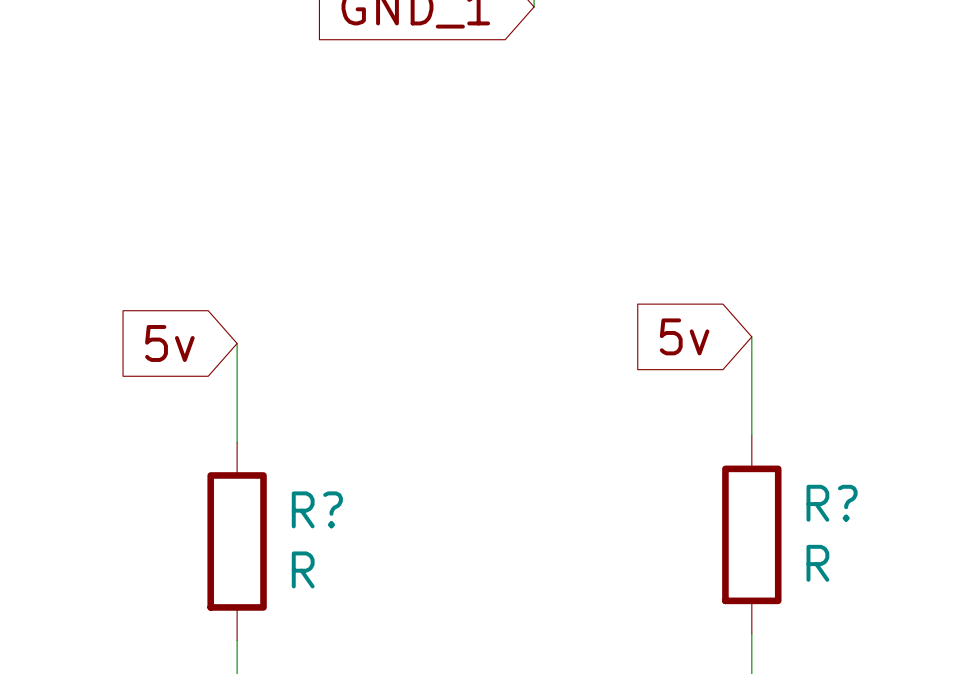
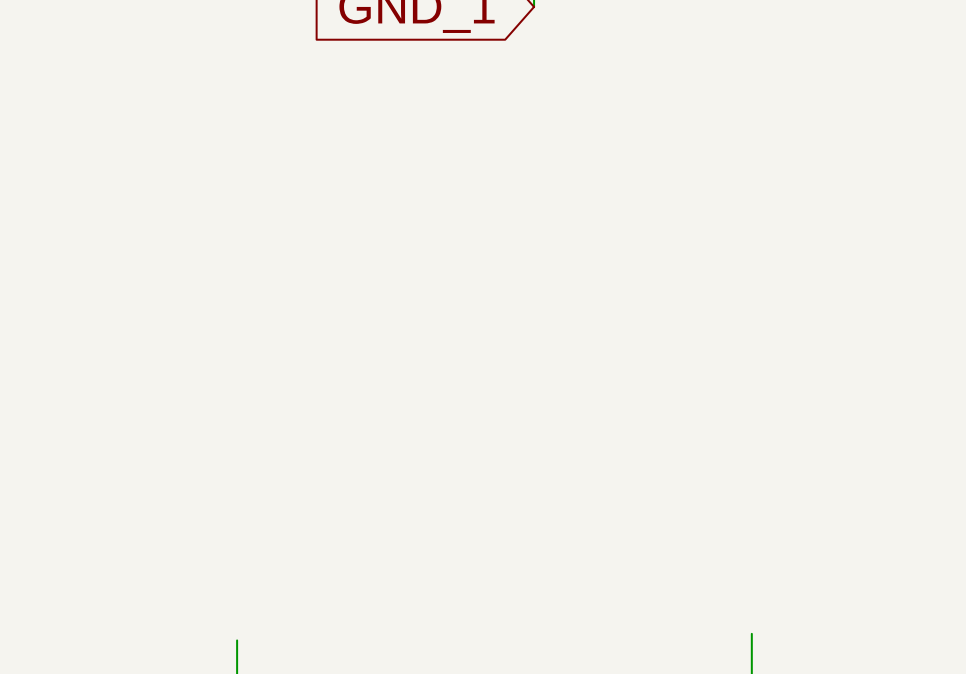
global label: 5v (684, 336) -> none
wire: (751, 336) (751, 435) -> none
global label: 5v (169, 343) -> none
wire: (237, 343) (237, 442) -> none
R?: R (751, 534) -> none
R?: R (237, 541) -> none

